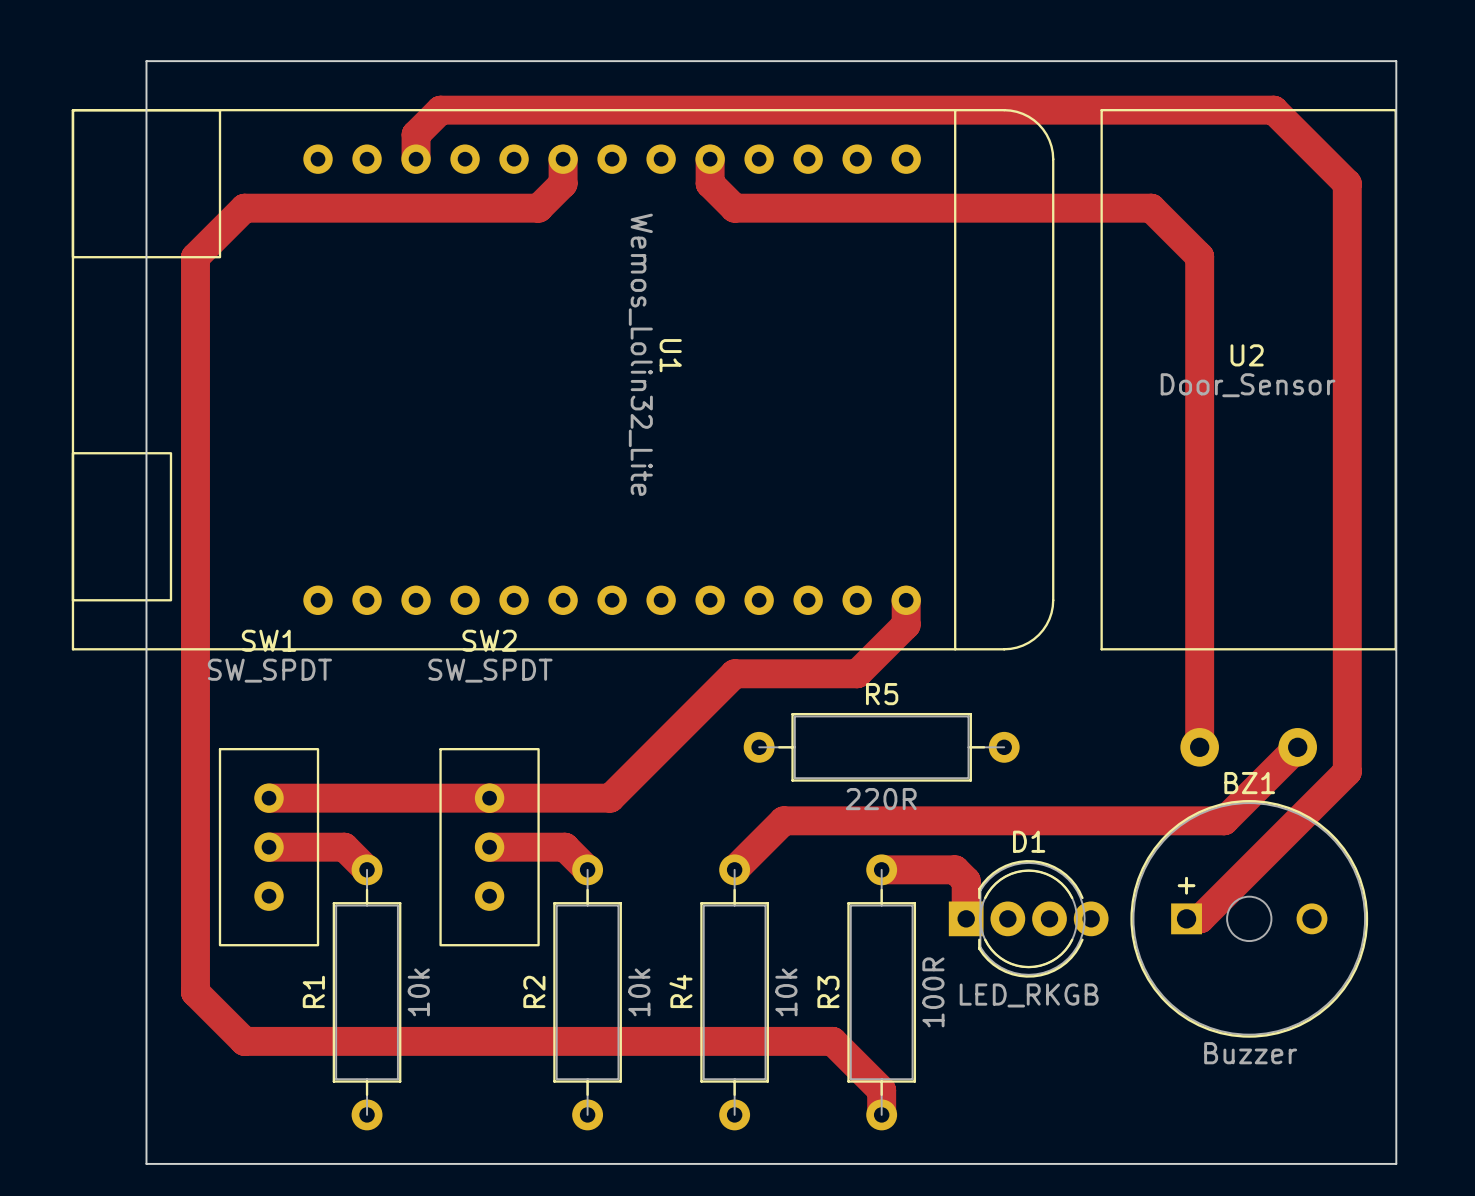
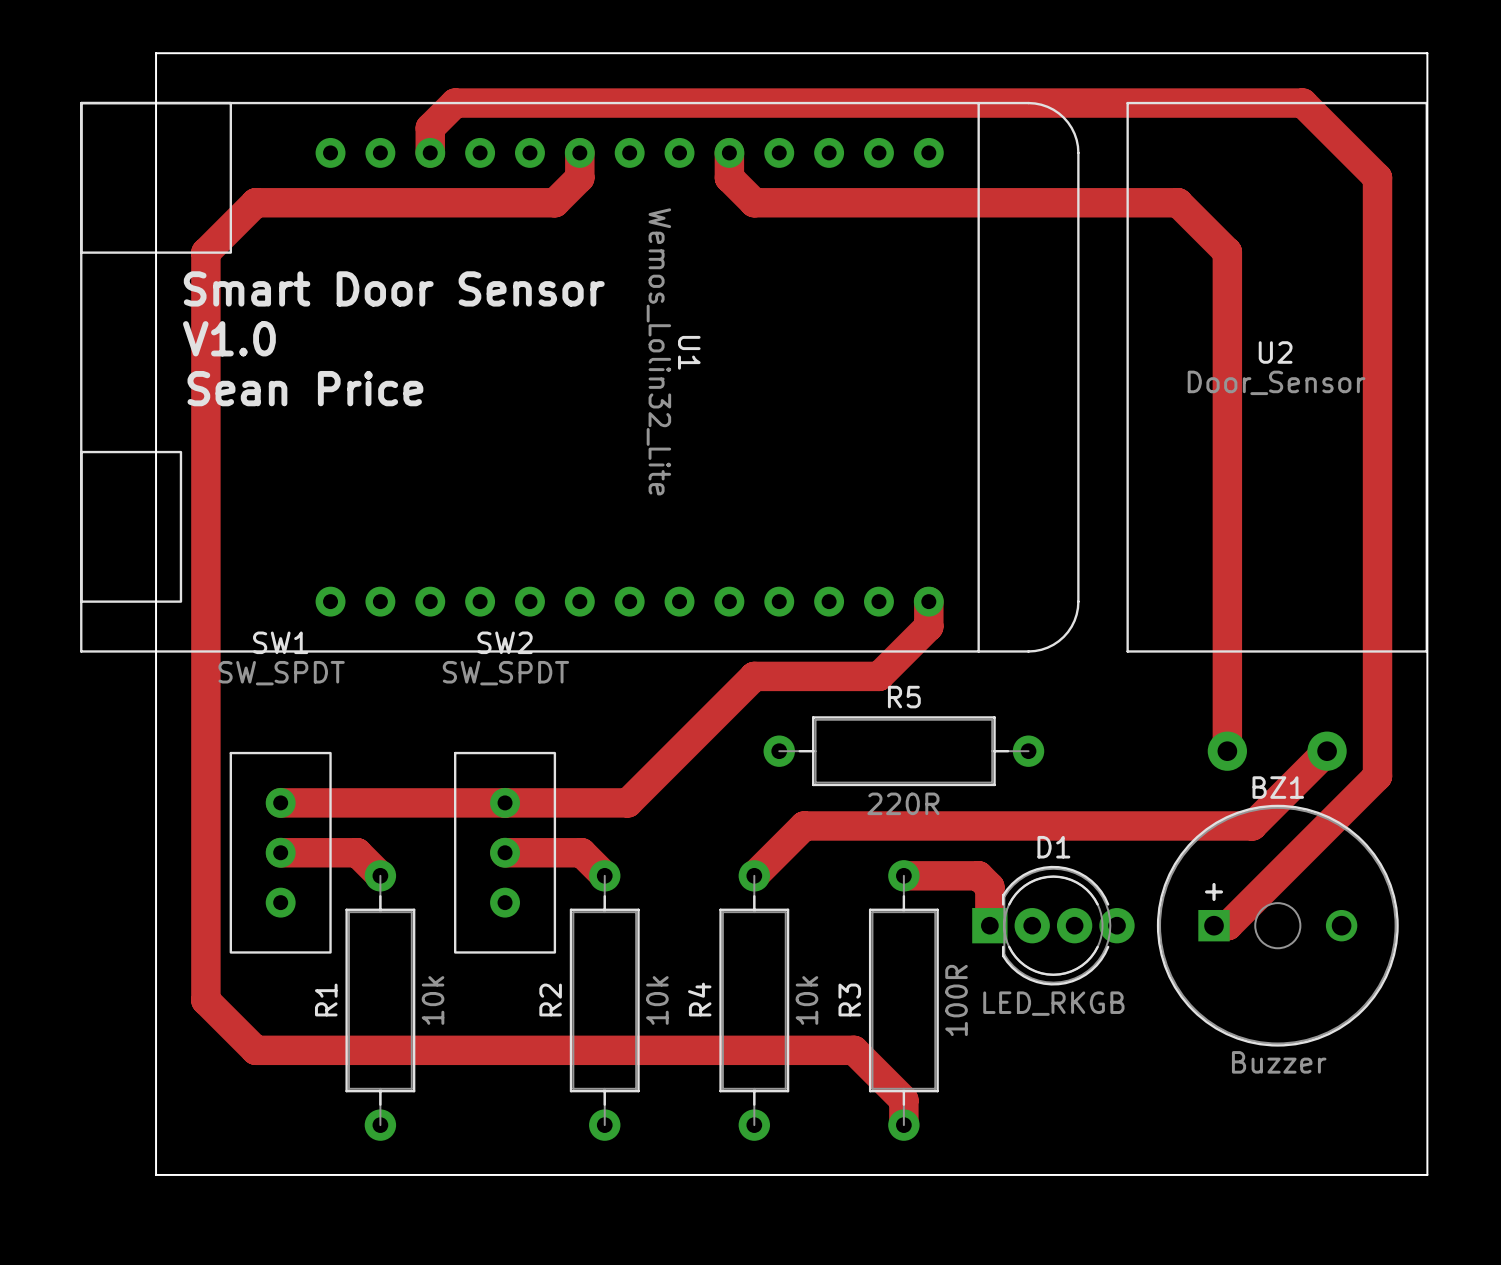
text: none -> Smart Door Sensor (394, 288)
text: none -> V1.0 (229, 338)
text: none -> Sean Price (305, 388)

